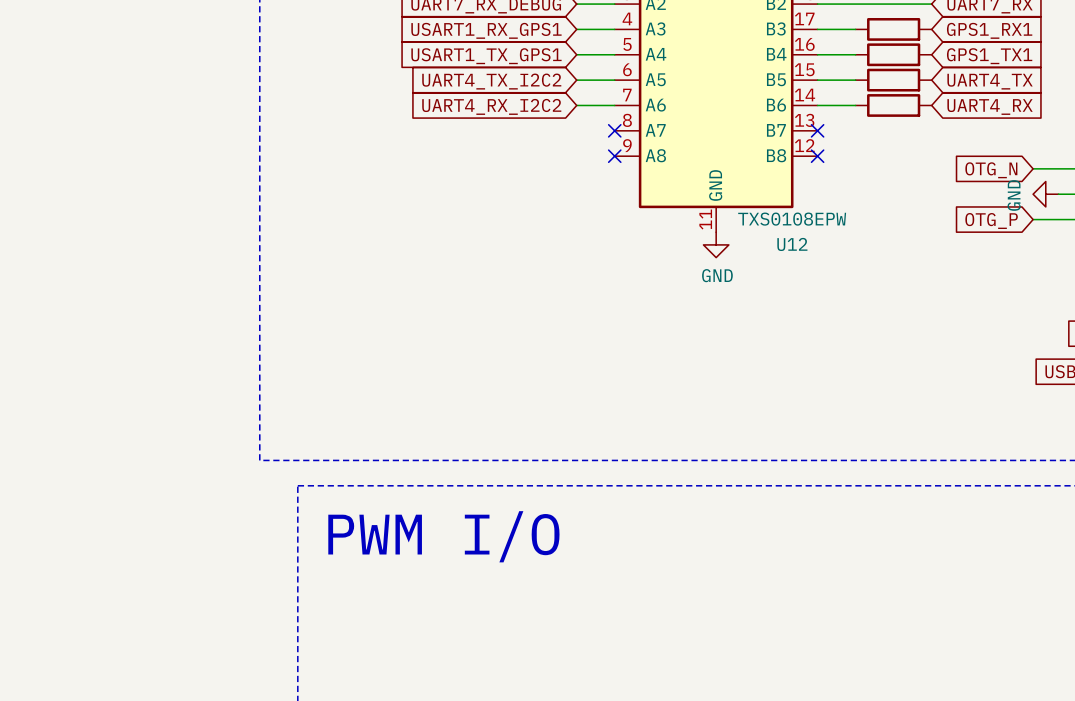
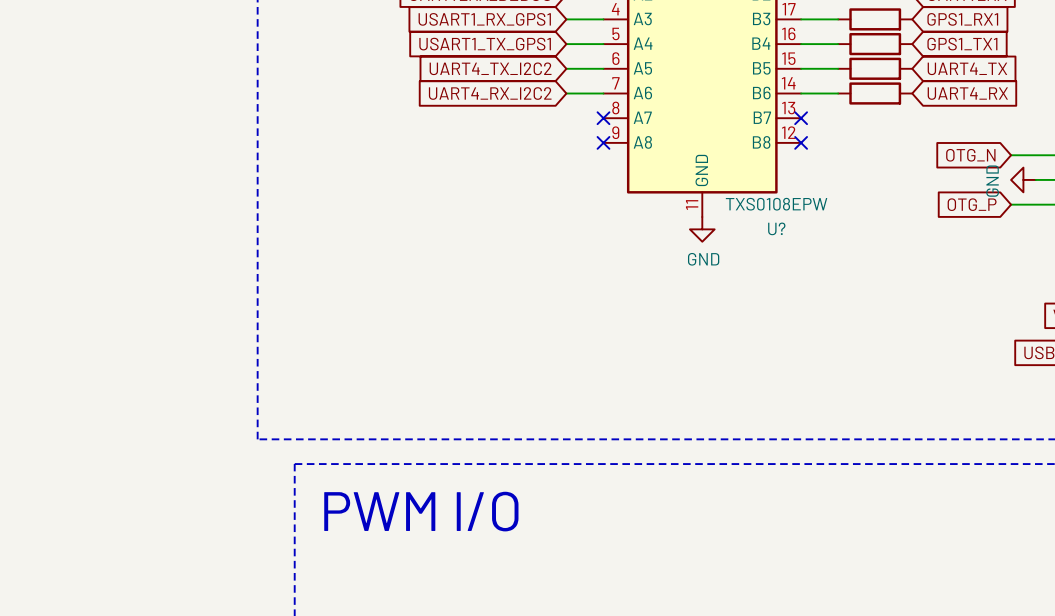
U12 name: U12 (792, 244) -> U? (776, 228)

